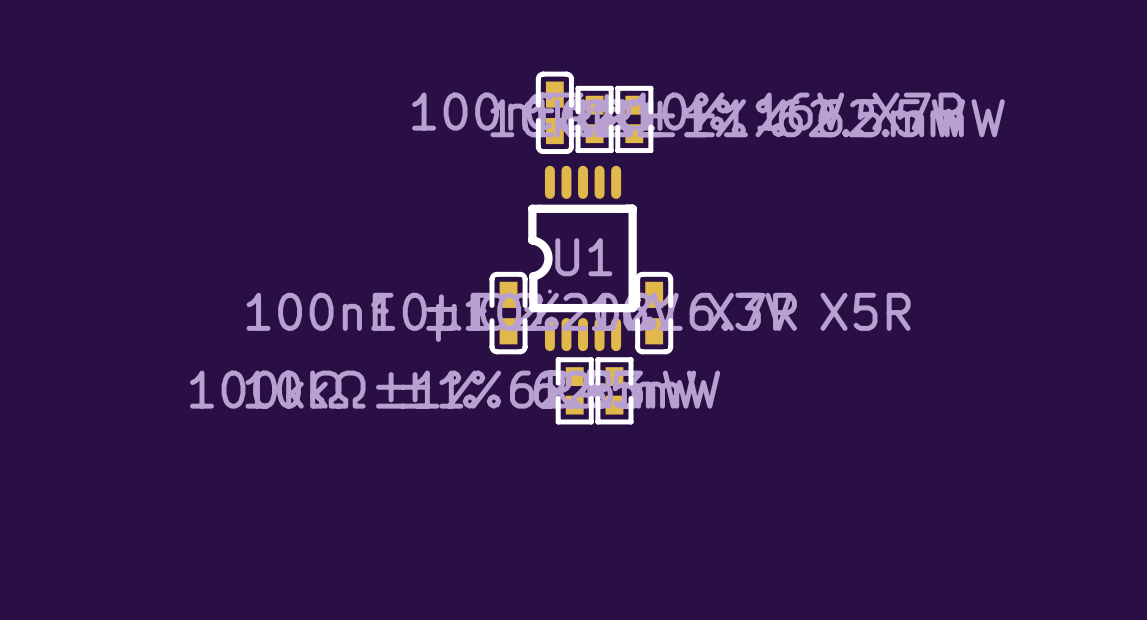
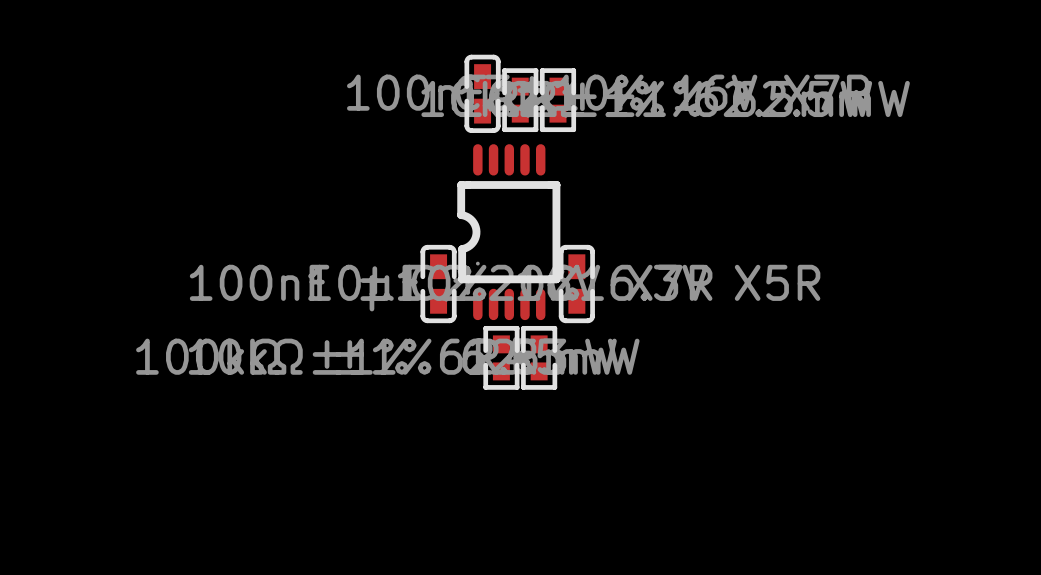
U1 name: U1 (583, 257) -> none

